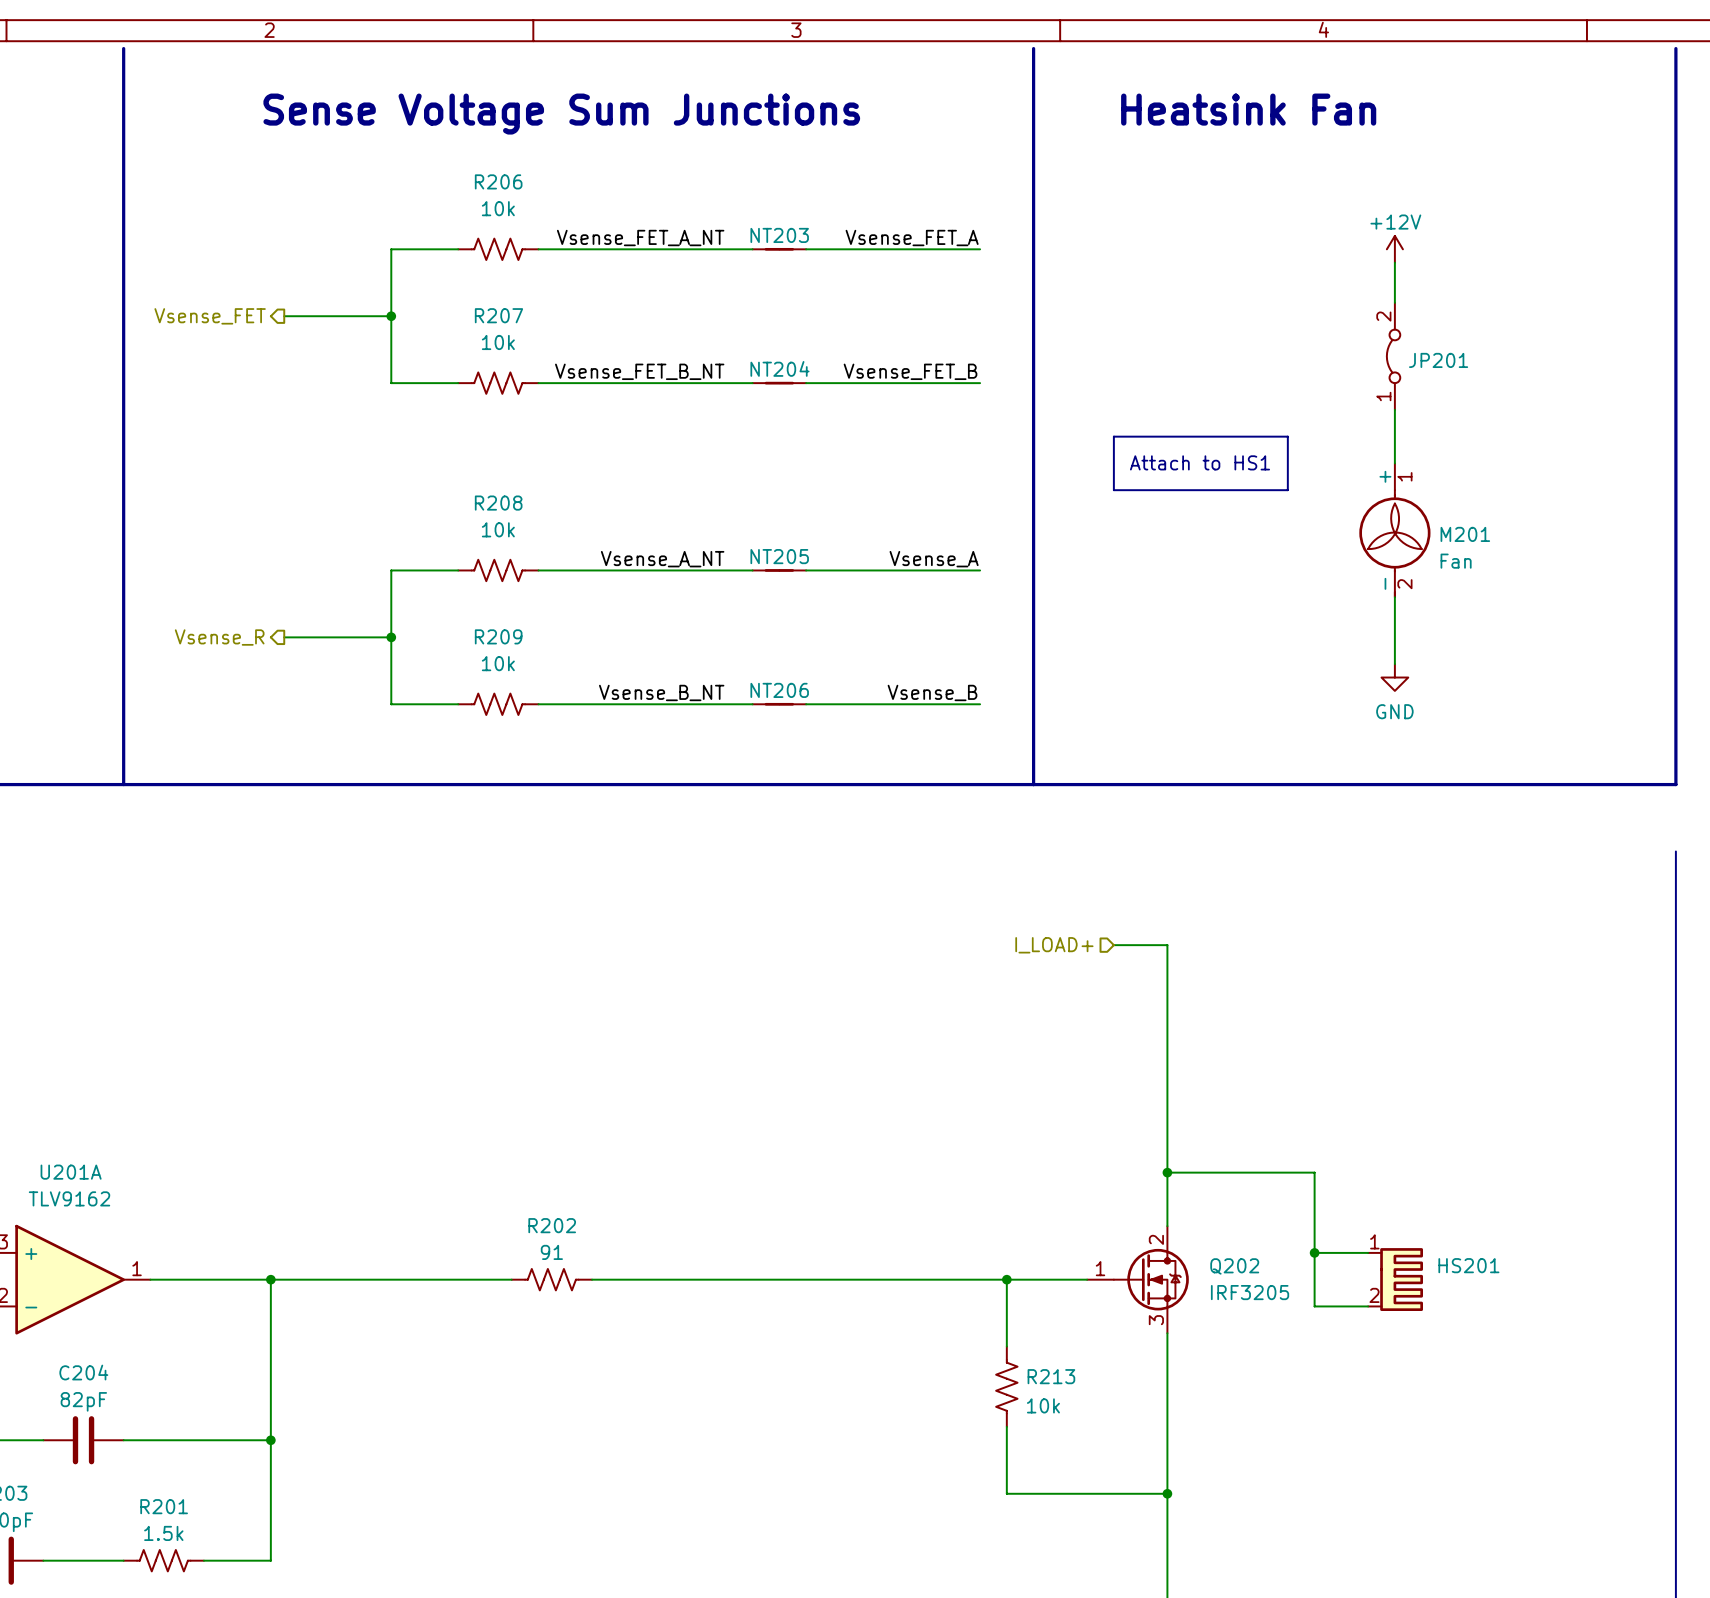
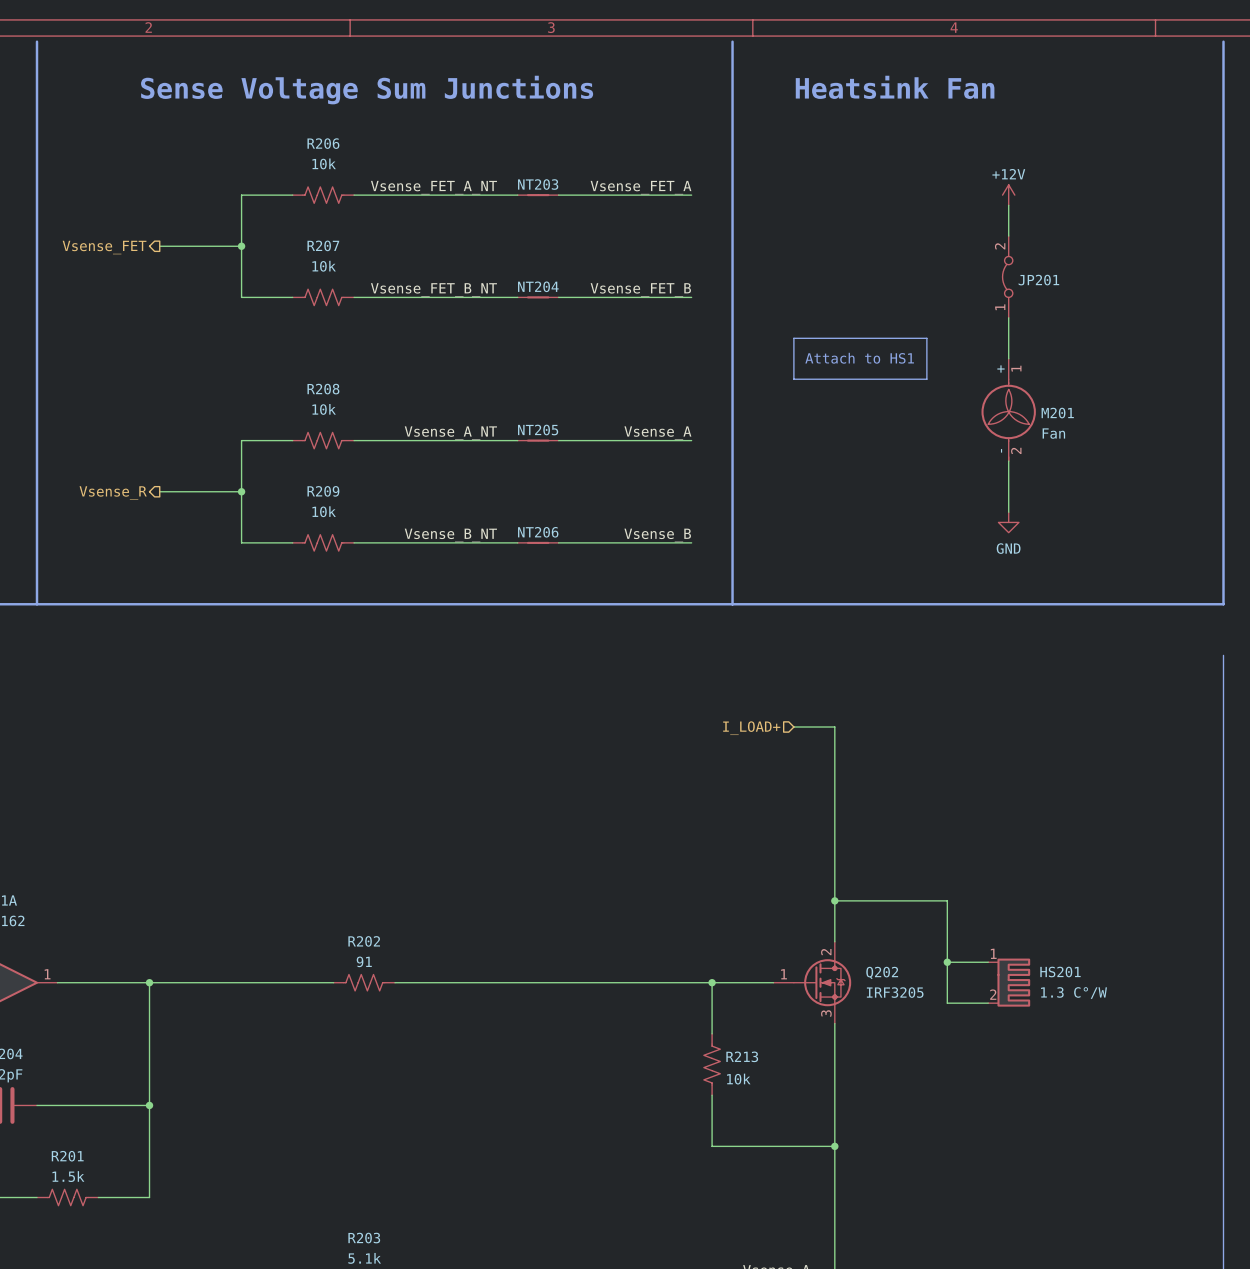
HS201 value: none -> 1.3 C°/W (1074, 993)

